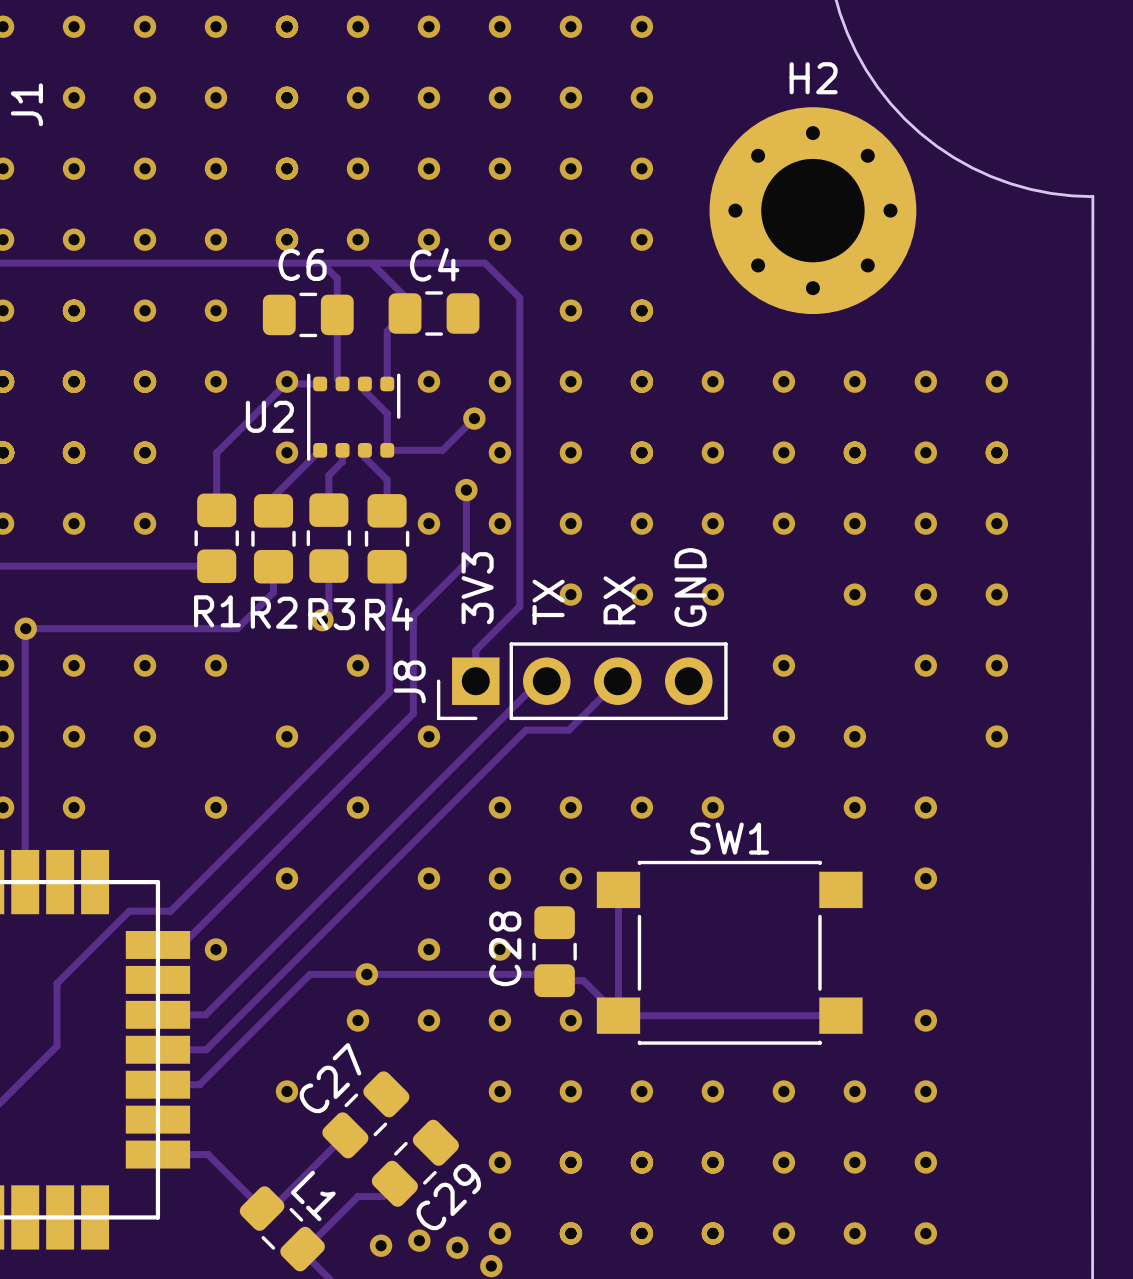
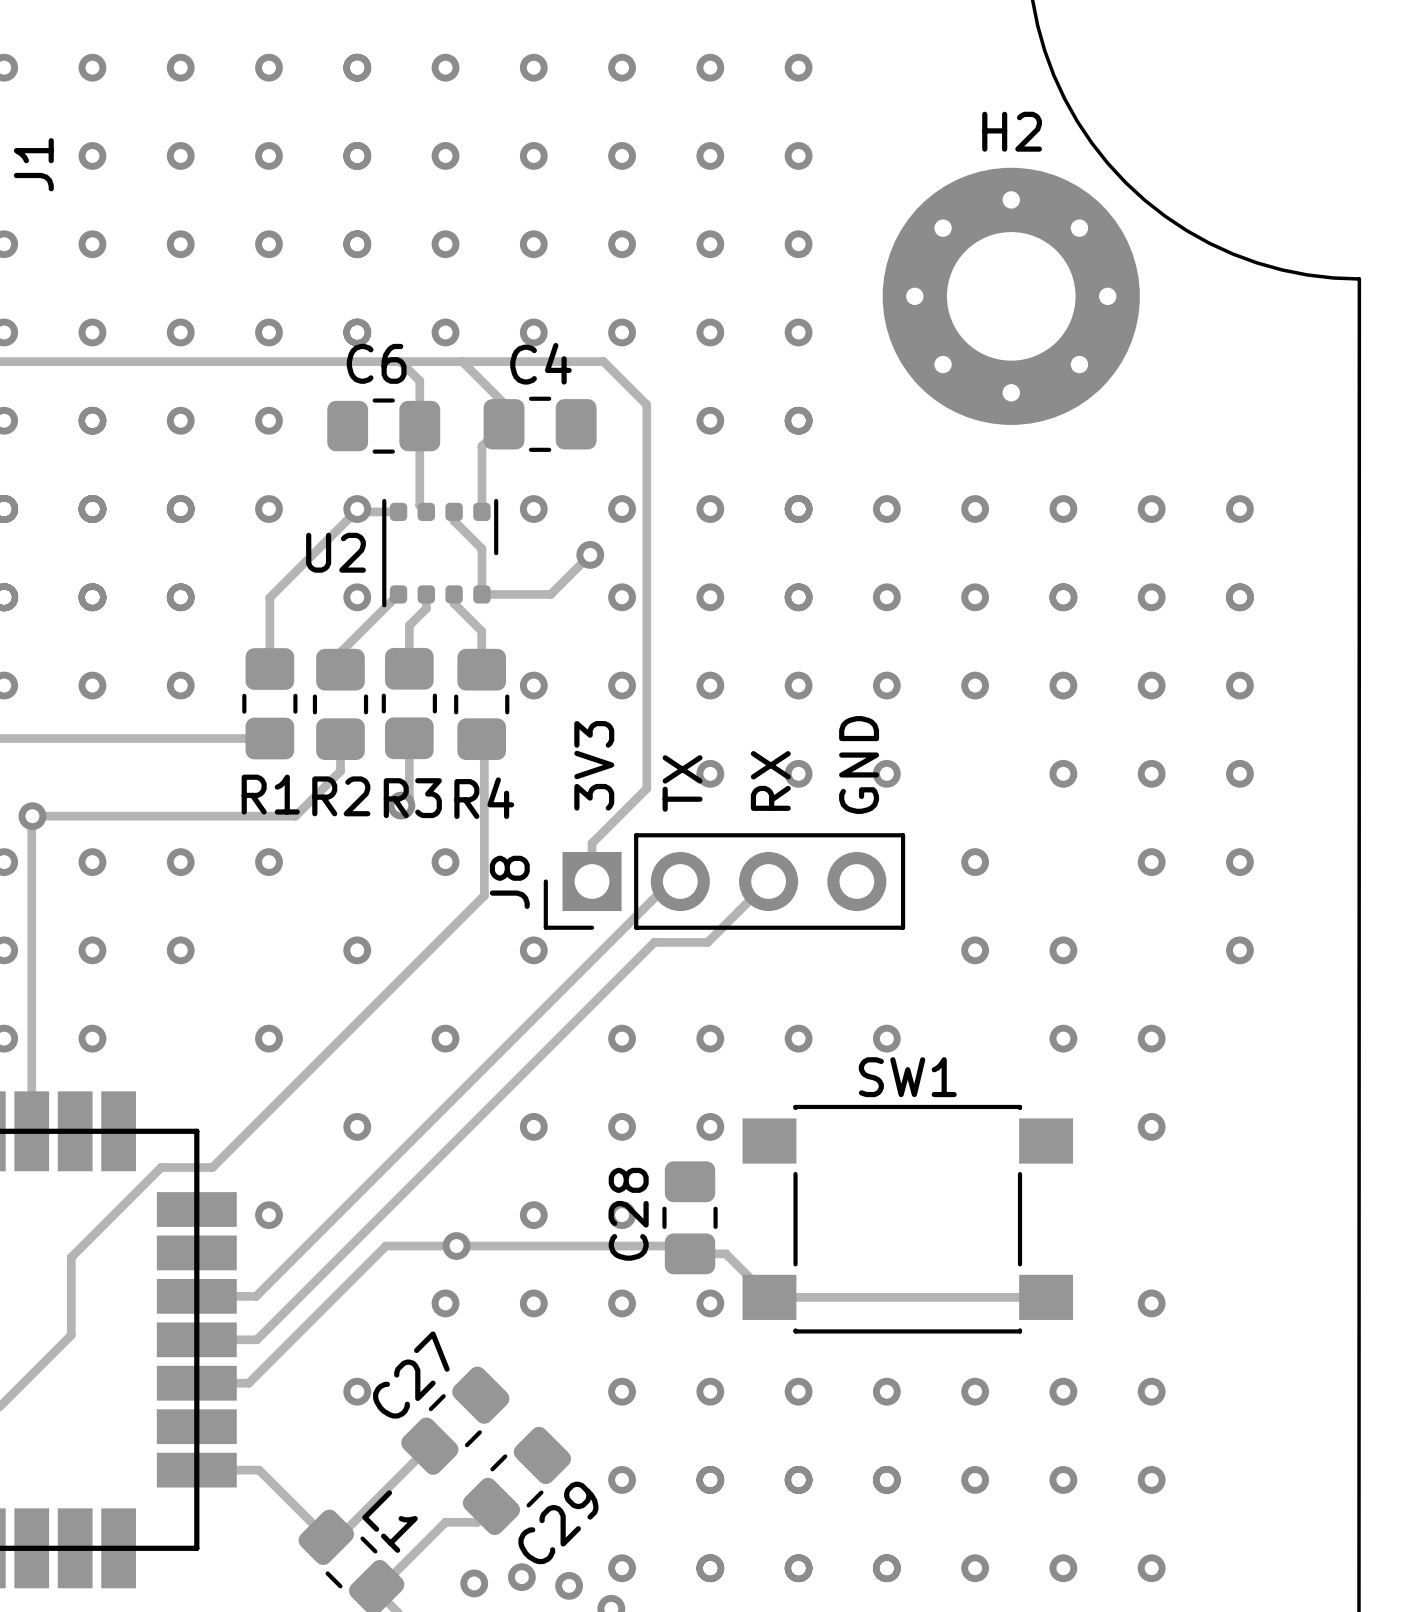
track: (466, 490) (466, 562) (413, 615) (413, 713) (181, 944) (157, 944) -> none
via: (466, 490) -> none
track: (618, 889) (618, 1015) -> none

